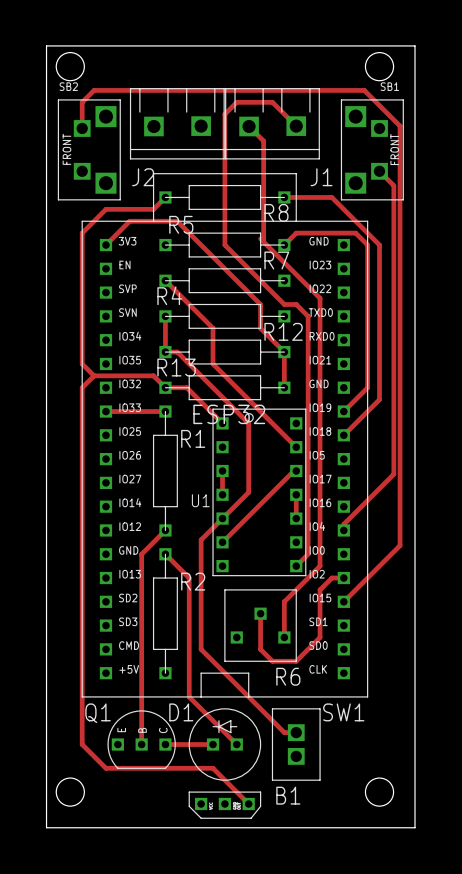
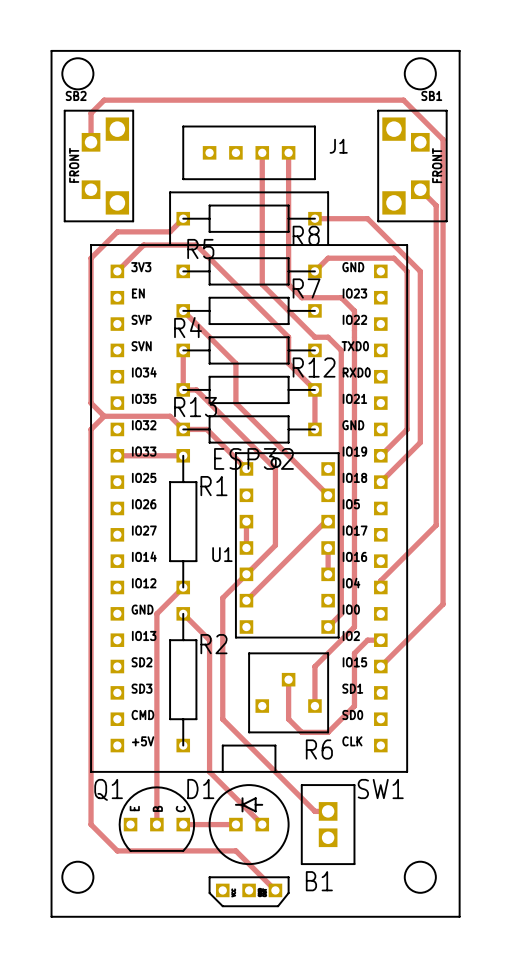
part: (177, 123) -> none
part: (272, 123) -> none
track: (249, 126) (263, 141) (263, 241) -> none
track: (296, 126) (272, 102) (236, 102) (224, 114) (224, 245) (236, 256) -> (262, 152) (262, 284)
J1: none -> (249, 152)
text: J2 (143, 177) -> none
text: J1 (321, 177) -> none
track: (260, 238) (320, 298) -> (288, 152) (288, 284) (301, 297) (341, 297) (354, 310) (354, 330)

